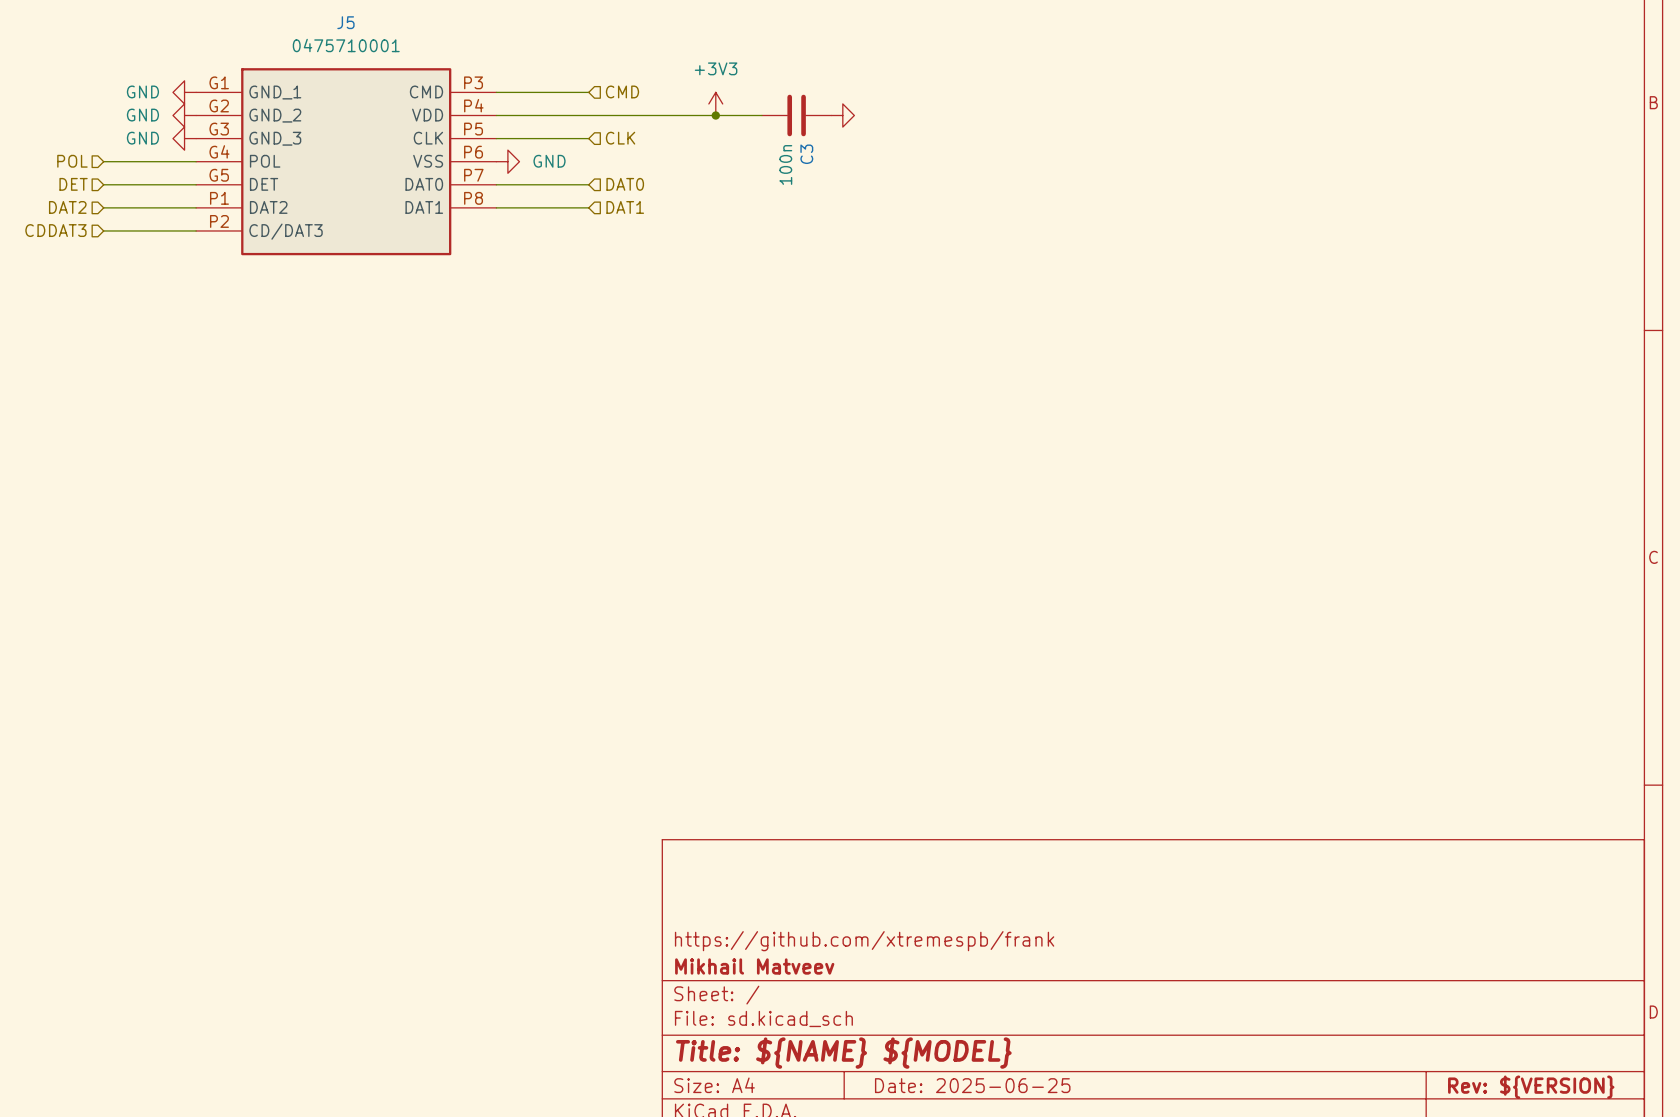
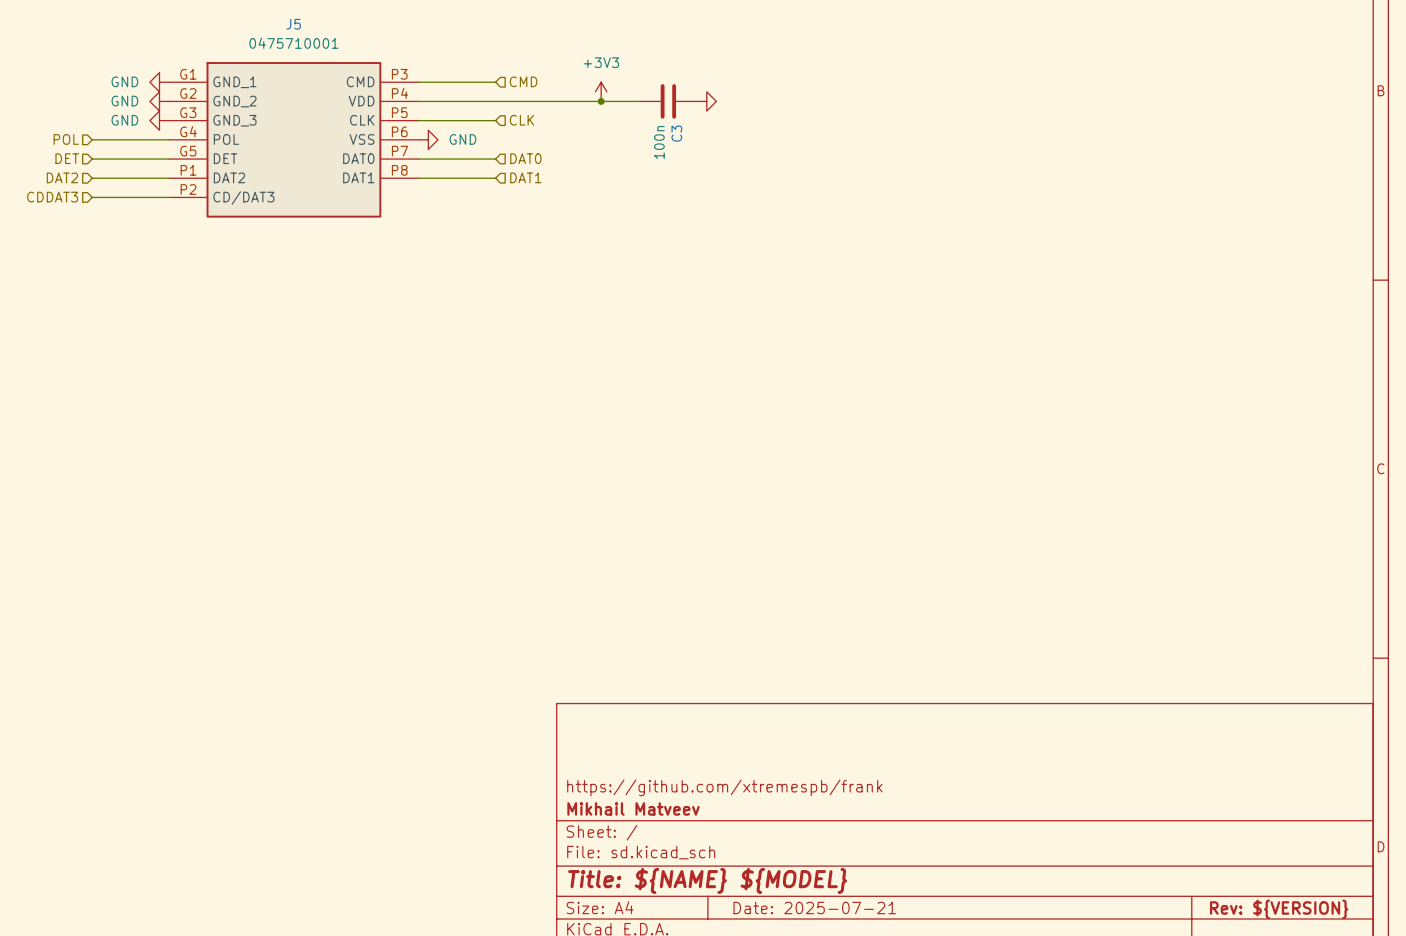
title block: Date: 2025-06-25 (972, 1085) -> Date: 2025-07-21 (814, 907)

